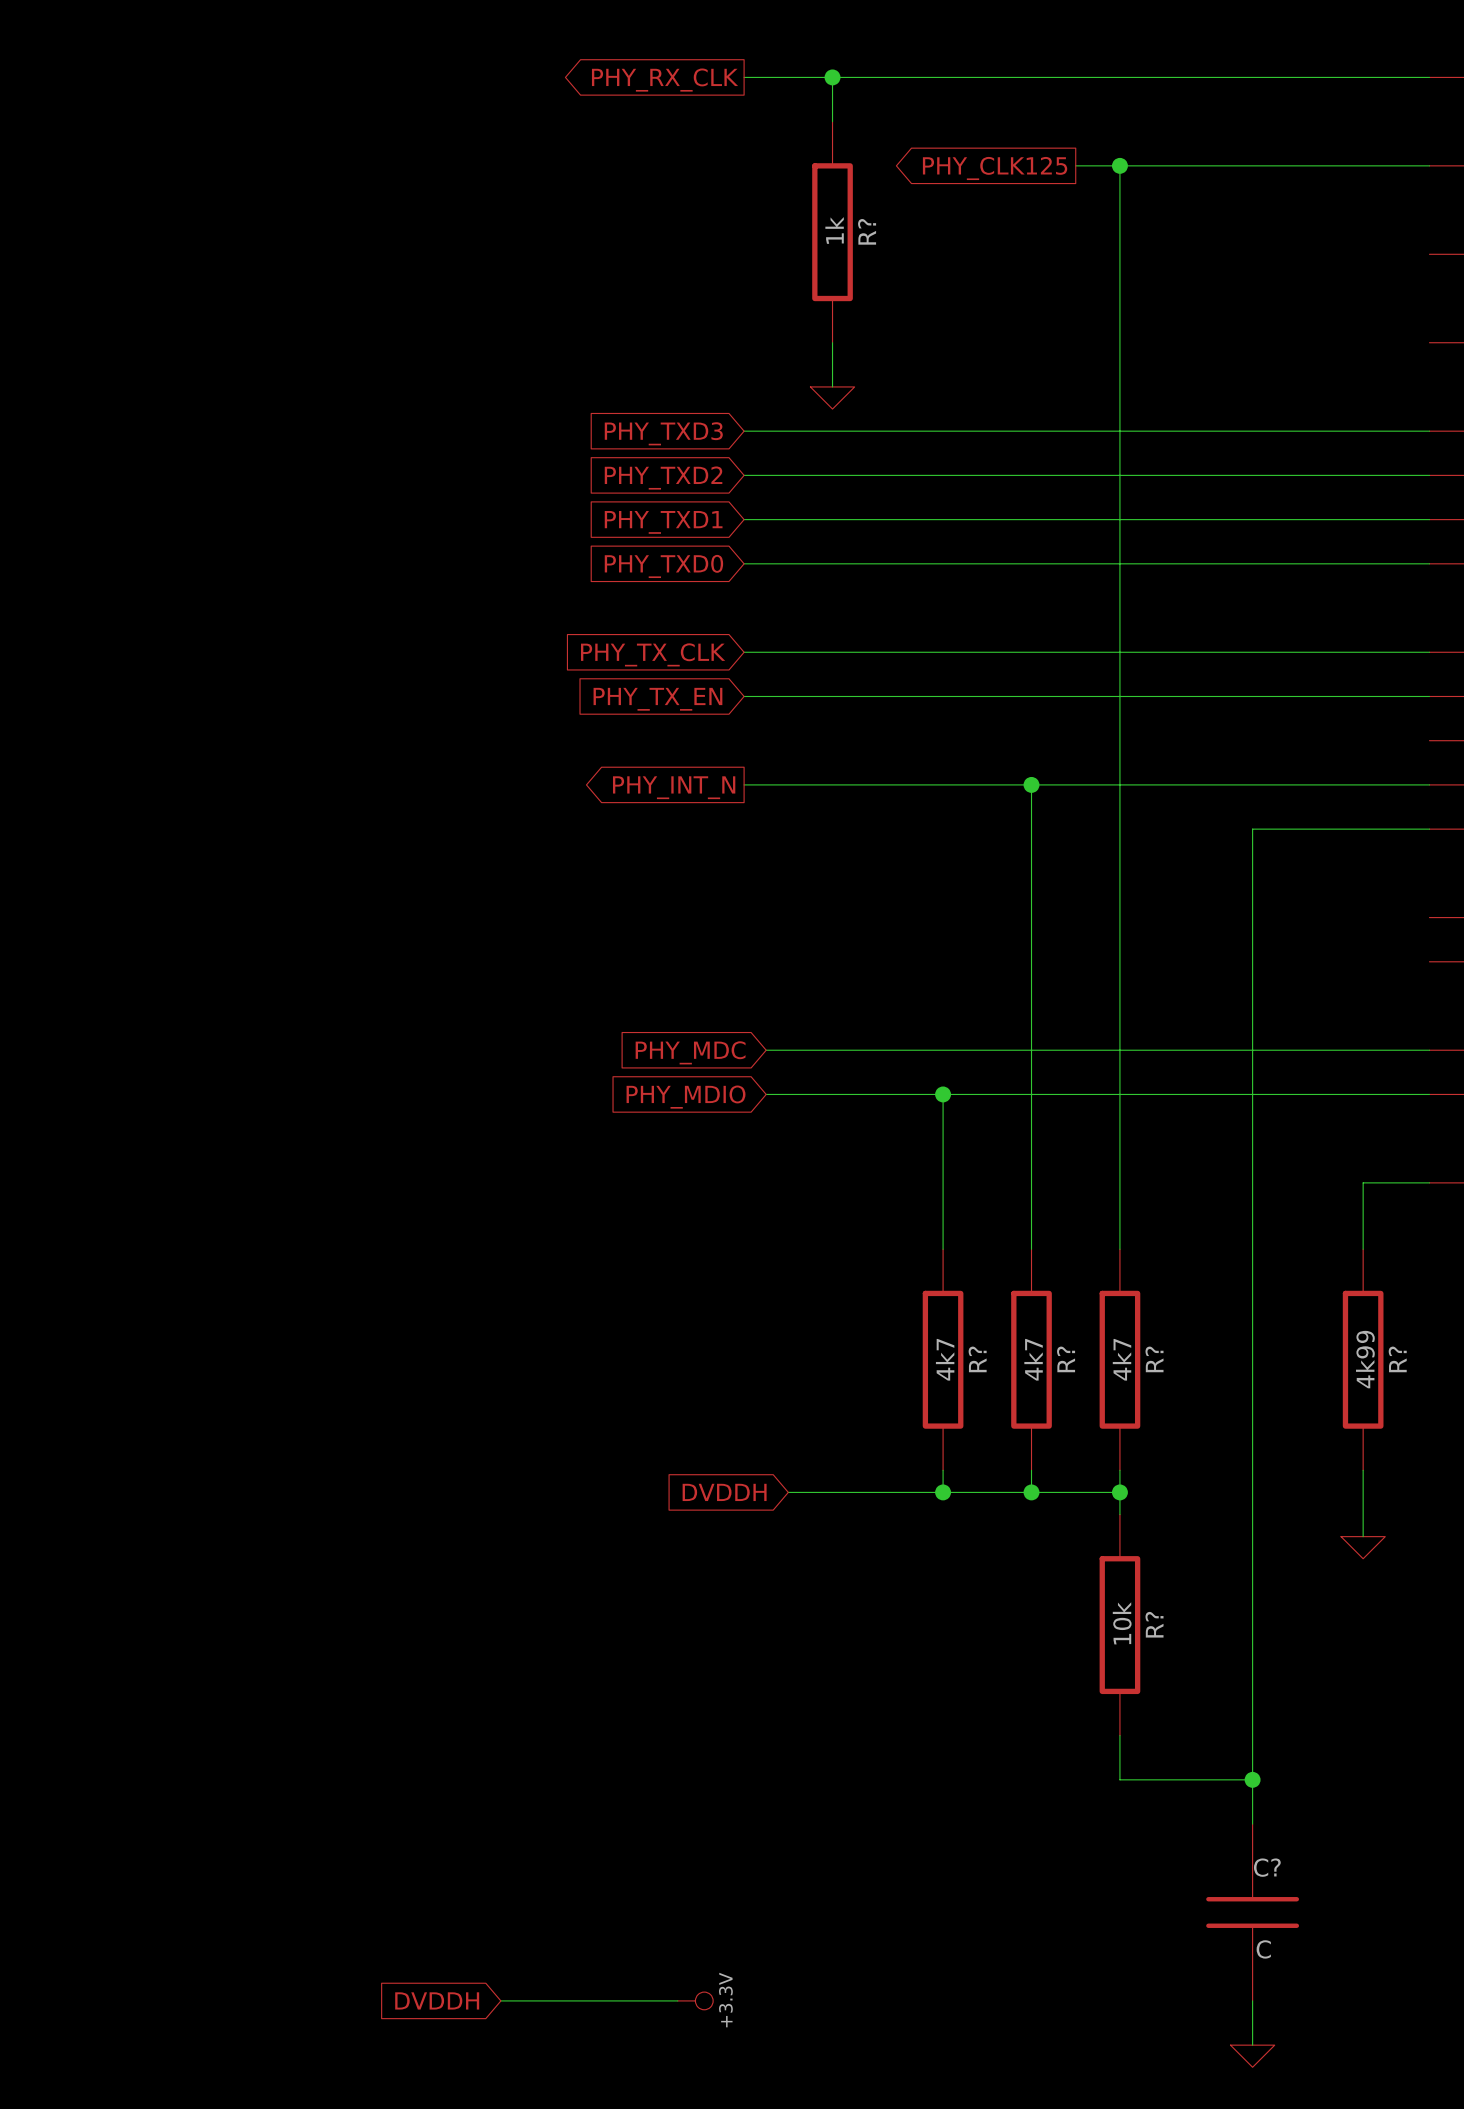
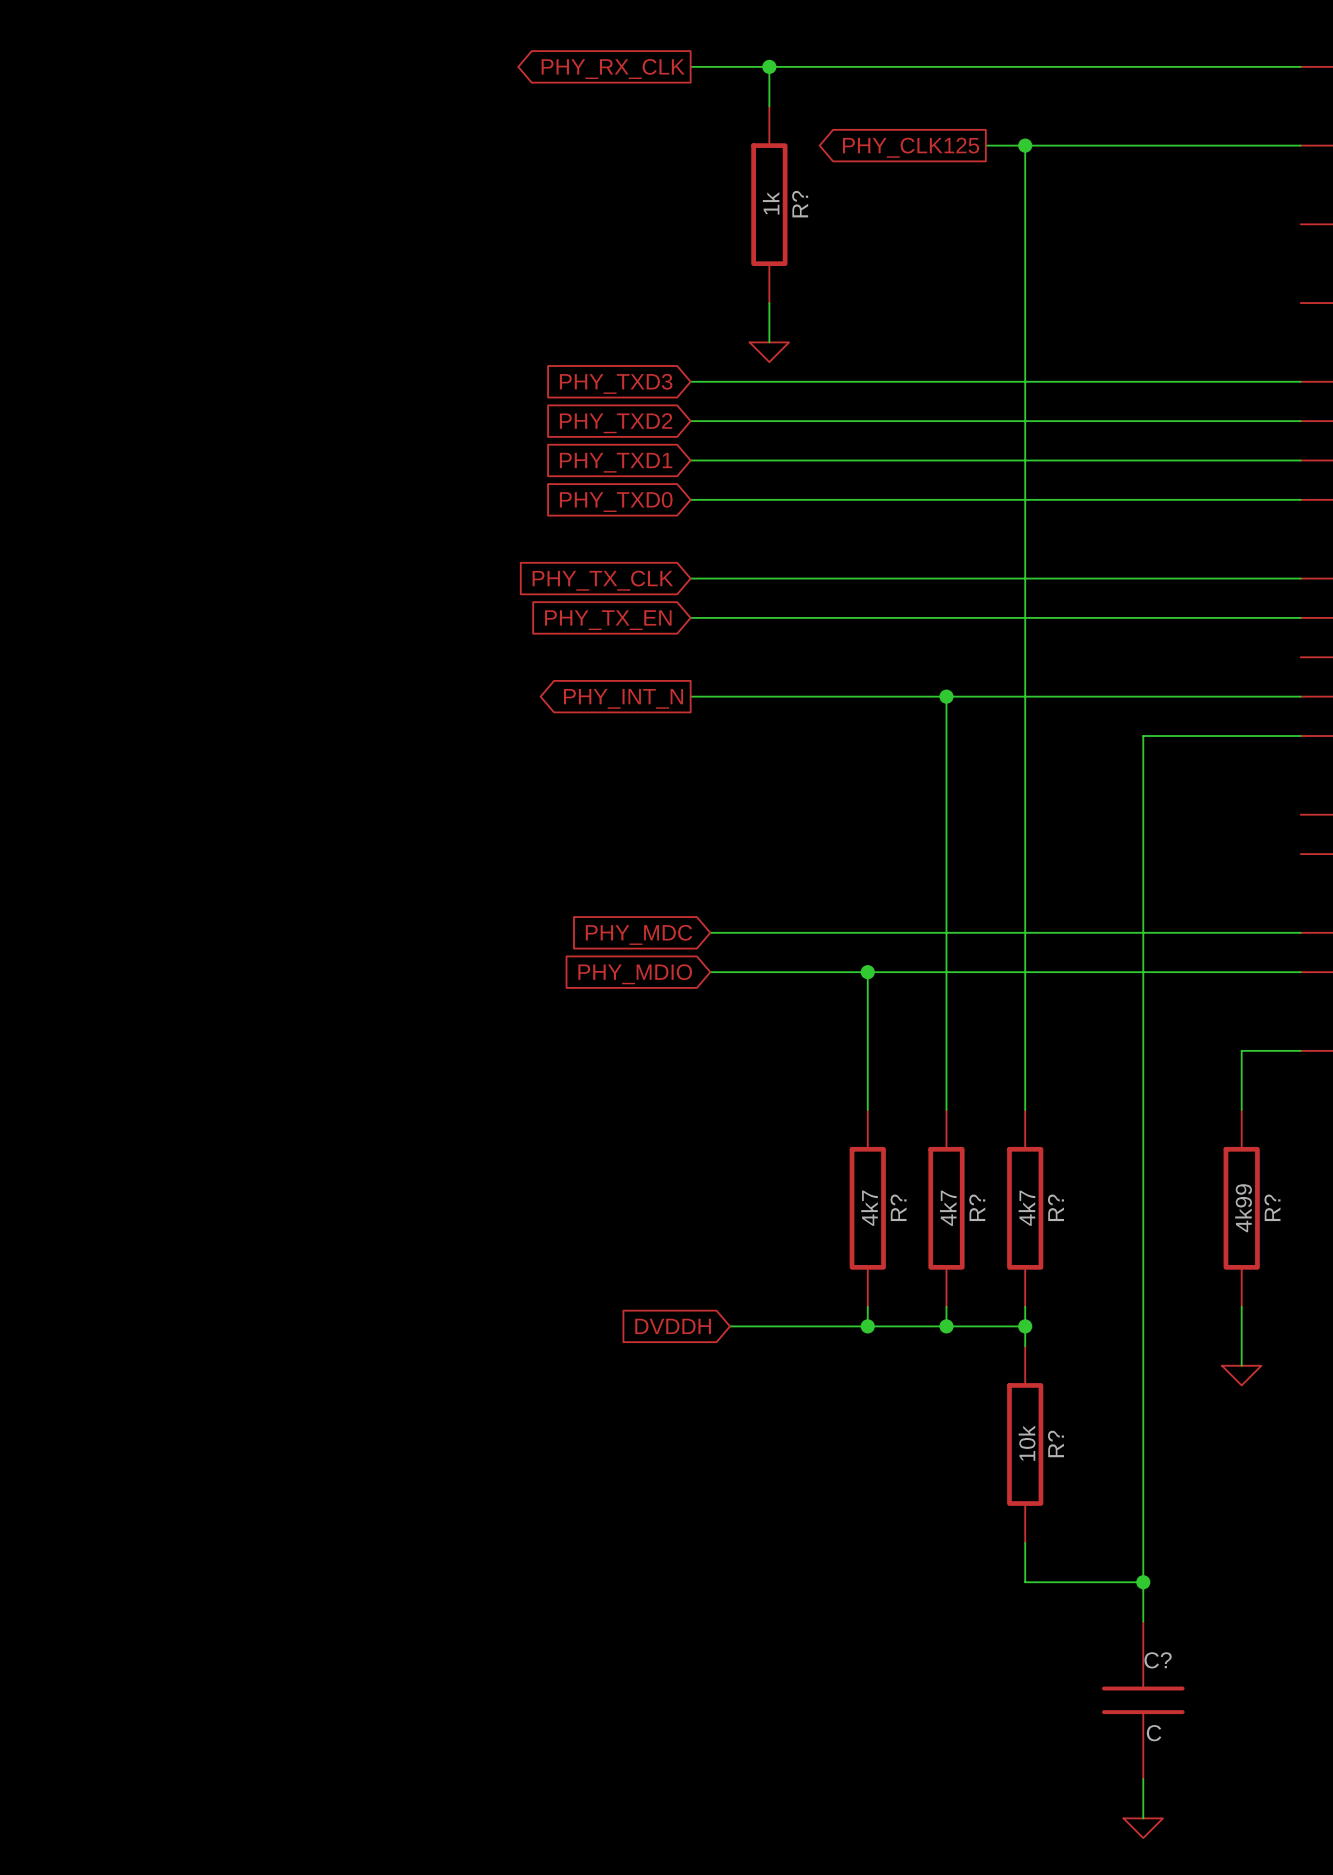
global label: DVDDH (437, 2000) -> none
wire: (500, 2000) (677, 2000) -> none
power symbol: +3.3V (695, 2000) -> none

